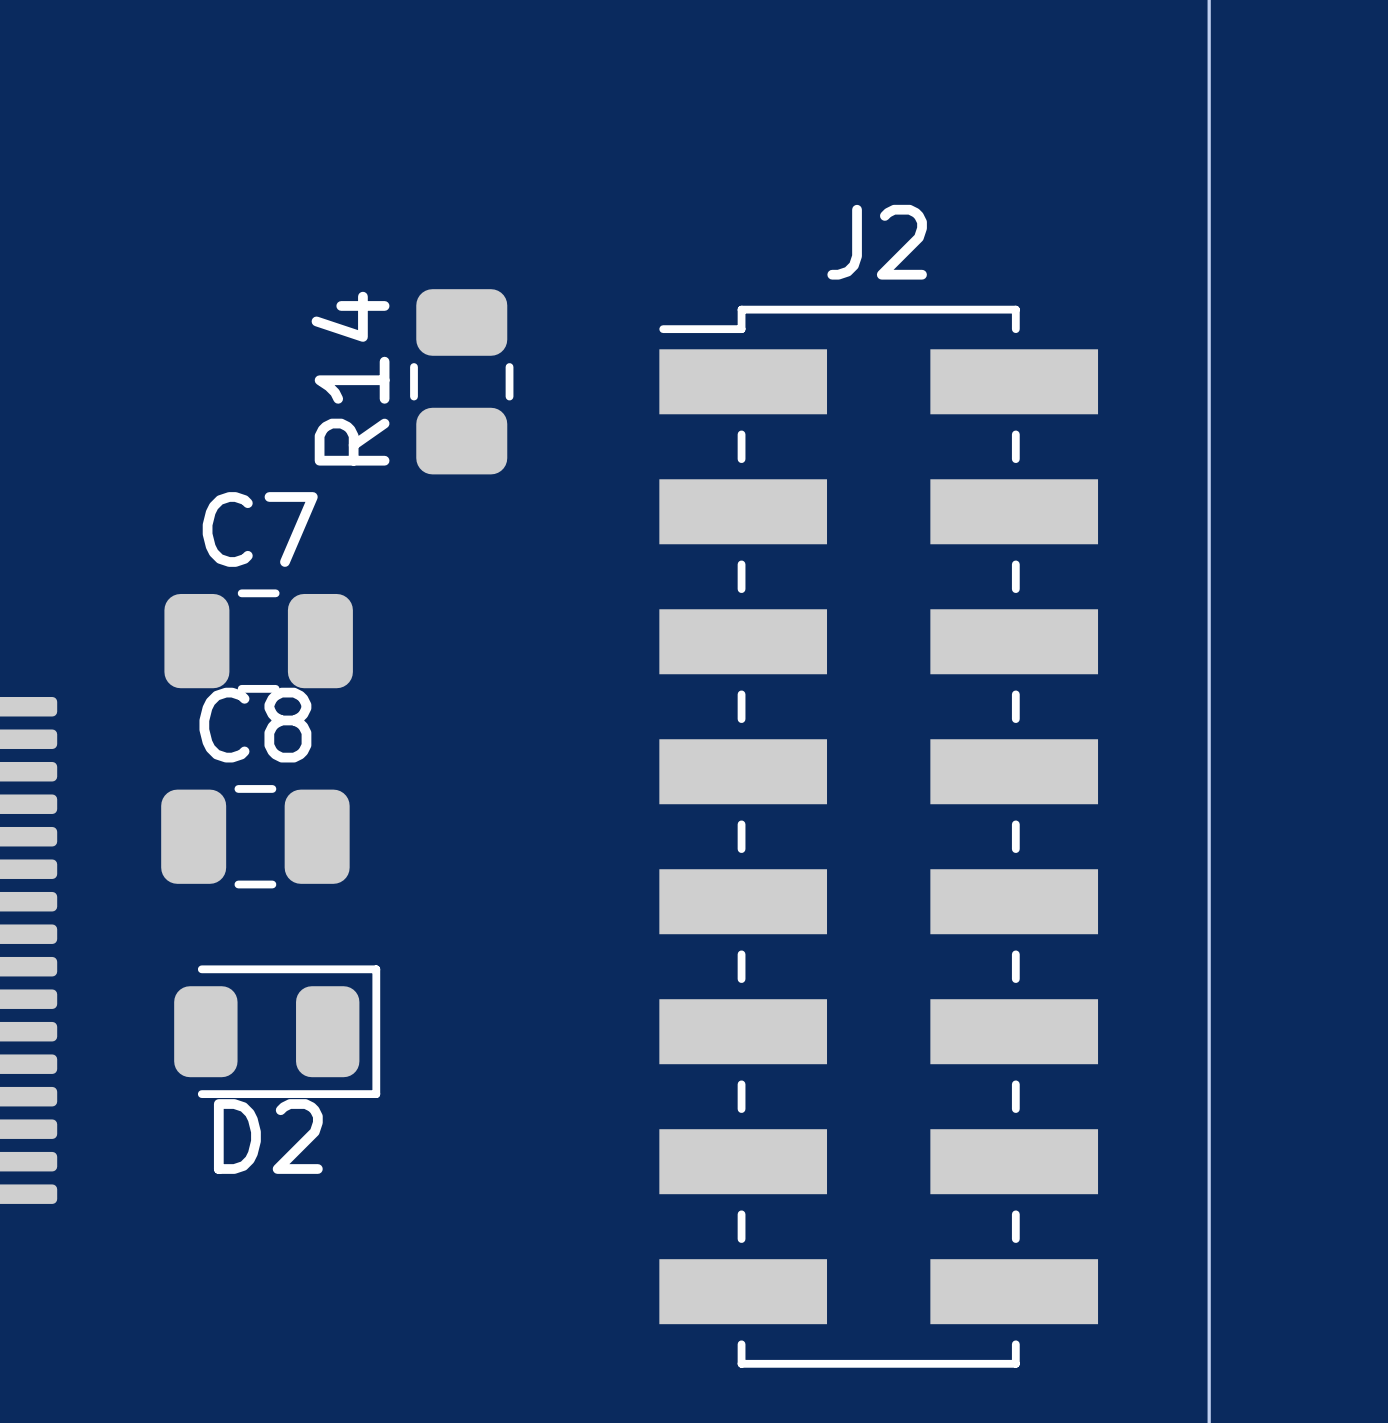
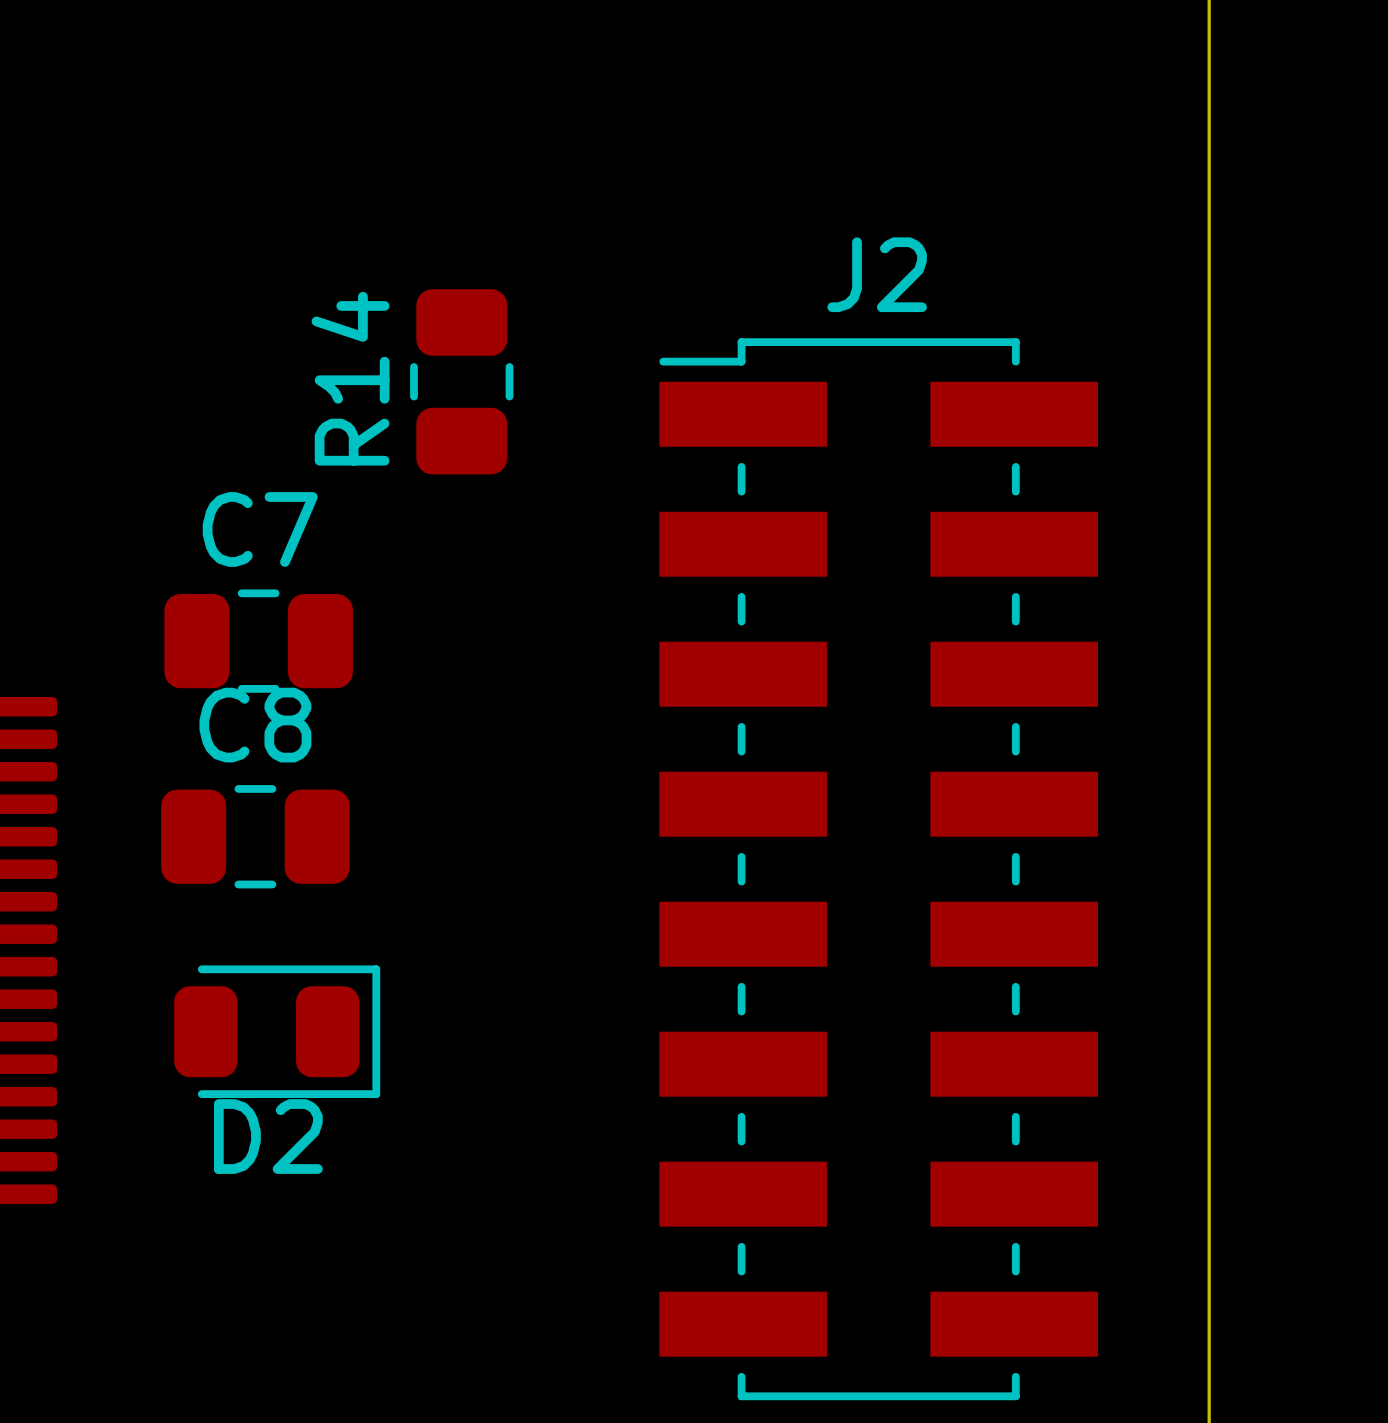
J2 position: (878, 836) -> (878, 869)

